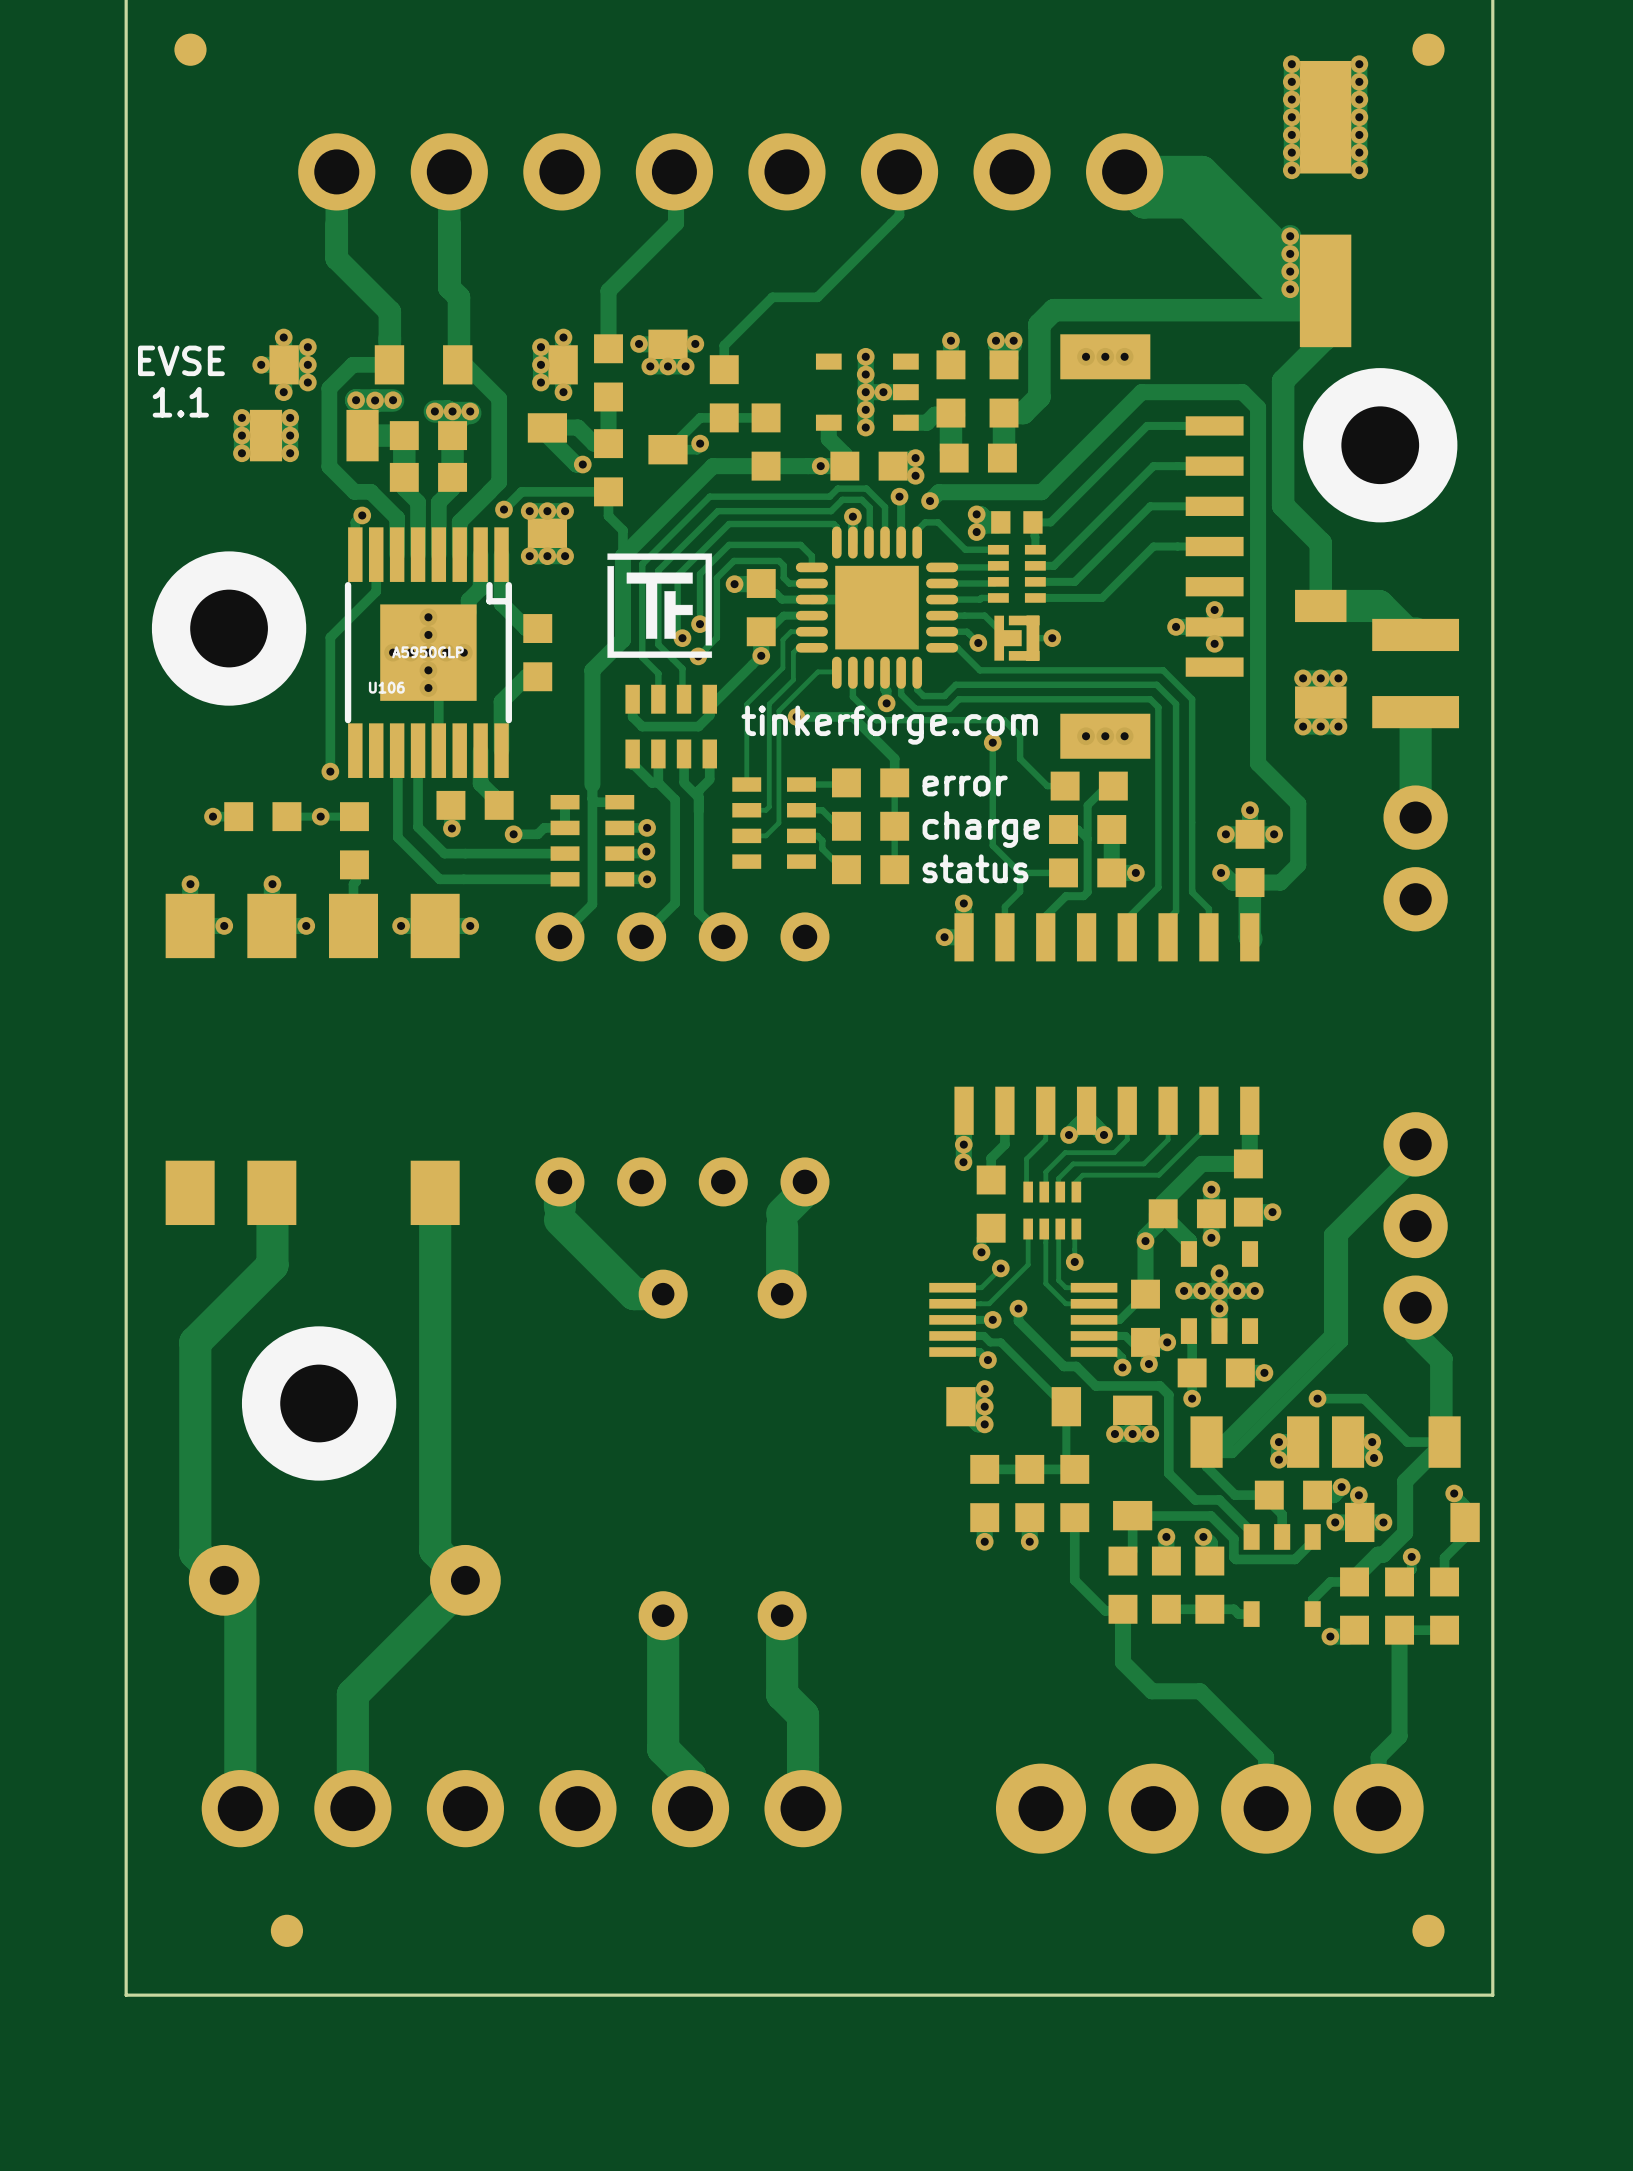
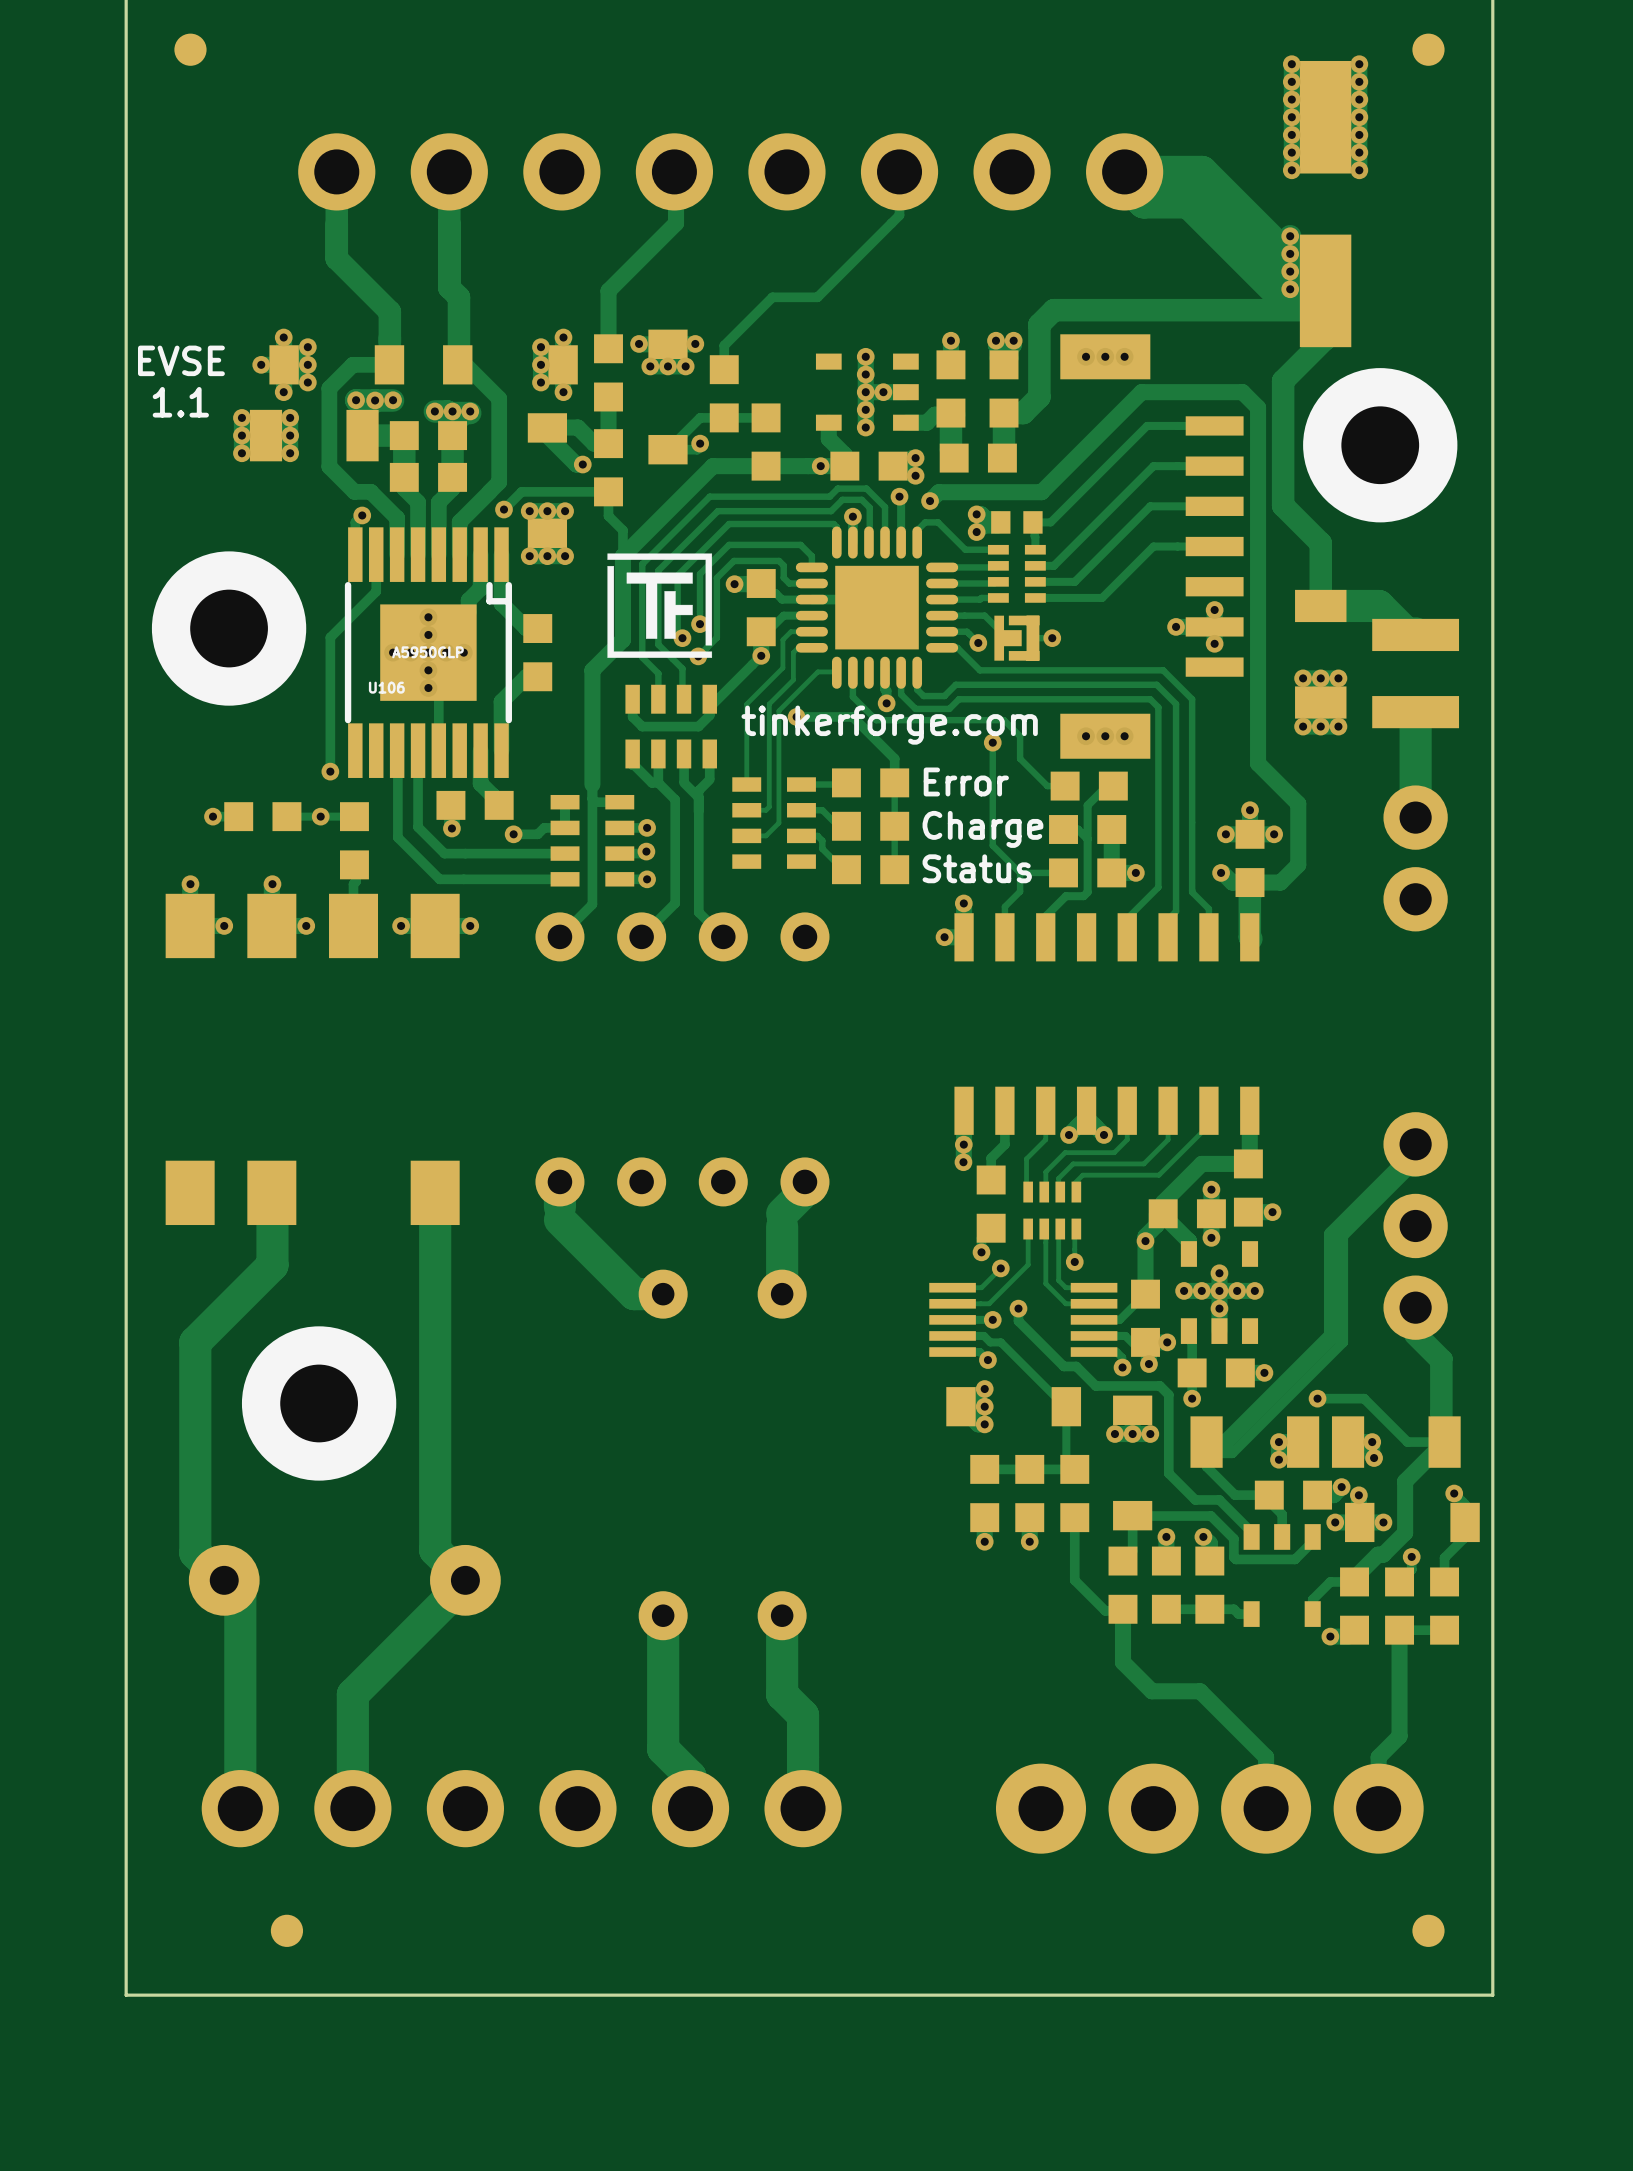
text: error (965, 785) -> Error (966, 781)
text: charge (981, 829) -> Charge (982, 829)
text: status (975, 868) -> Status (977, 868)

